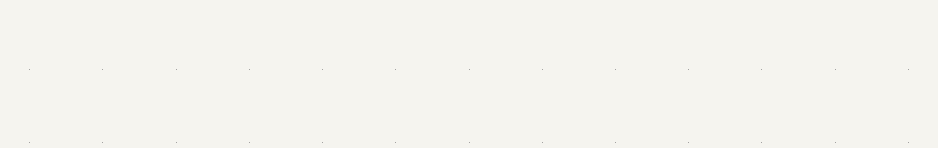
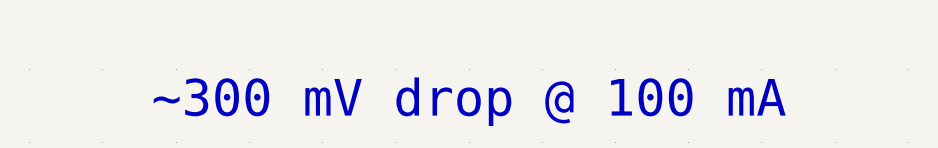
text: none -> ~300 mV drop @ 100 mA (469, 101)

